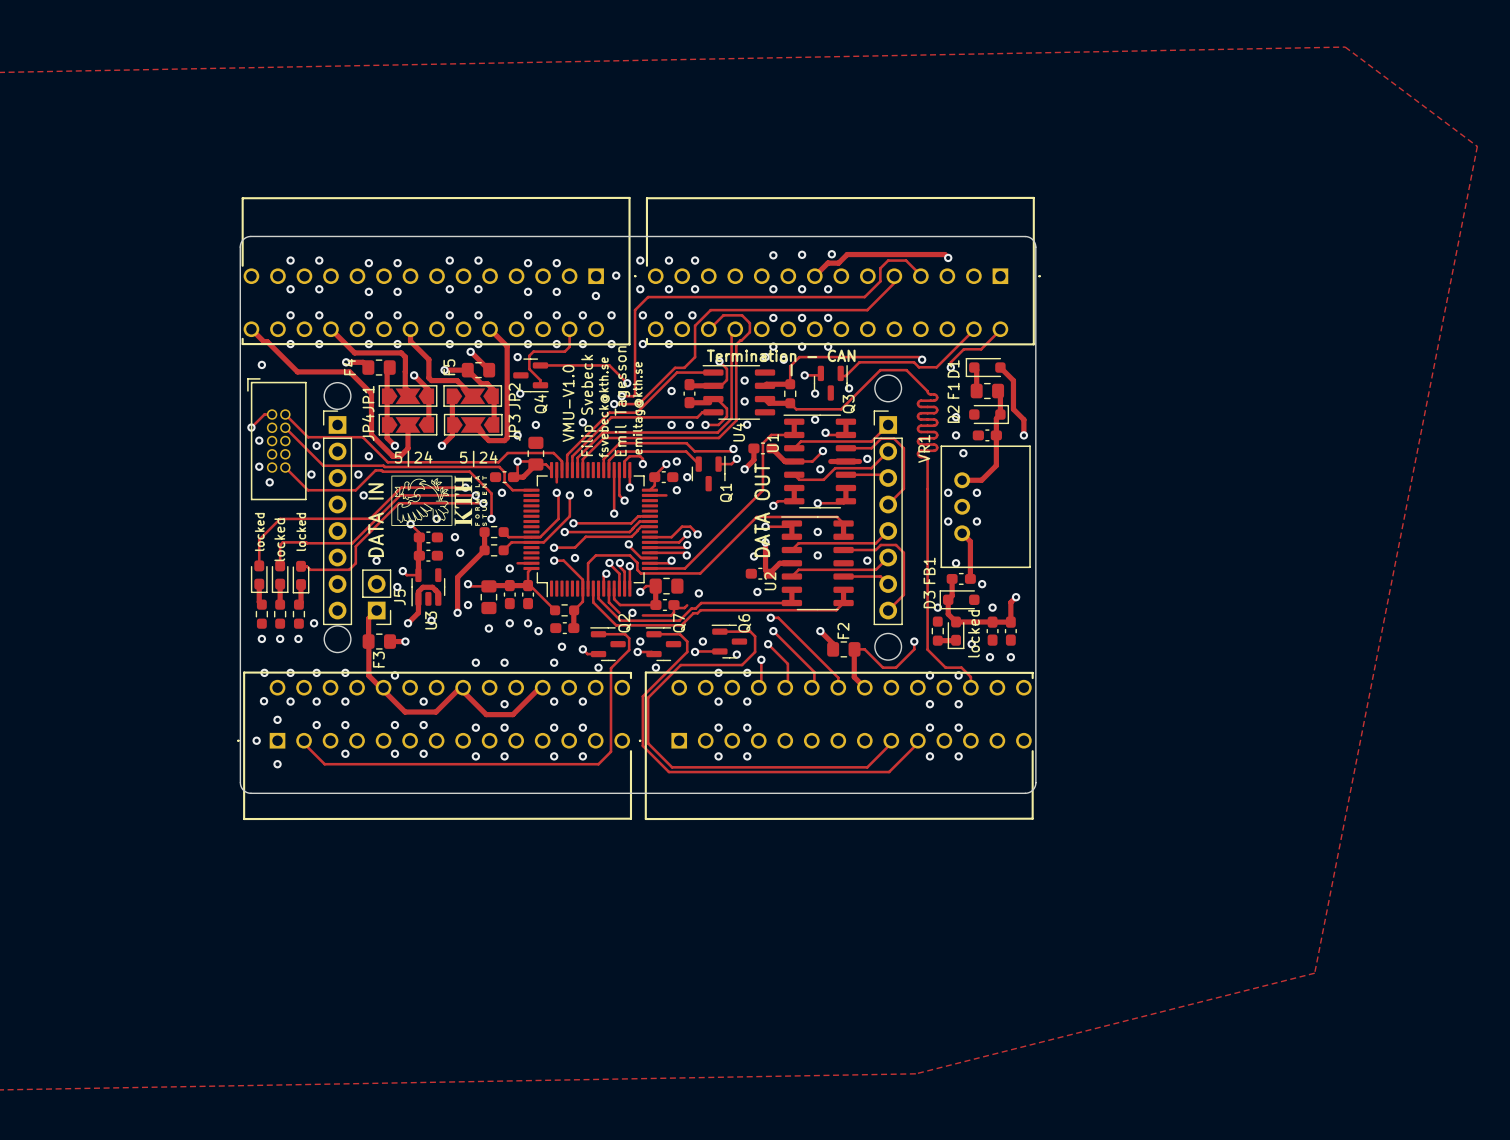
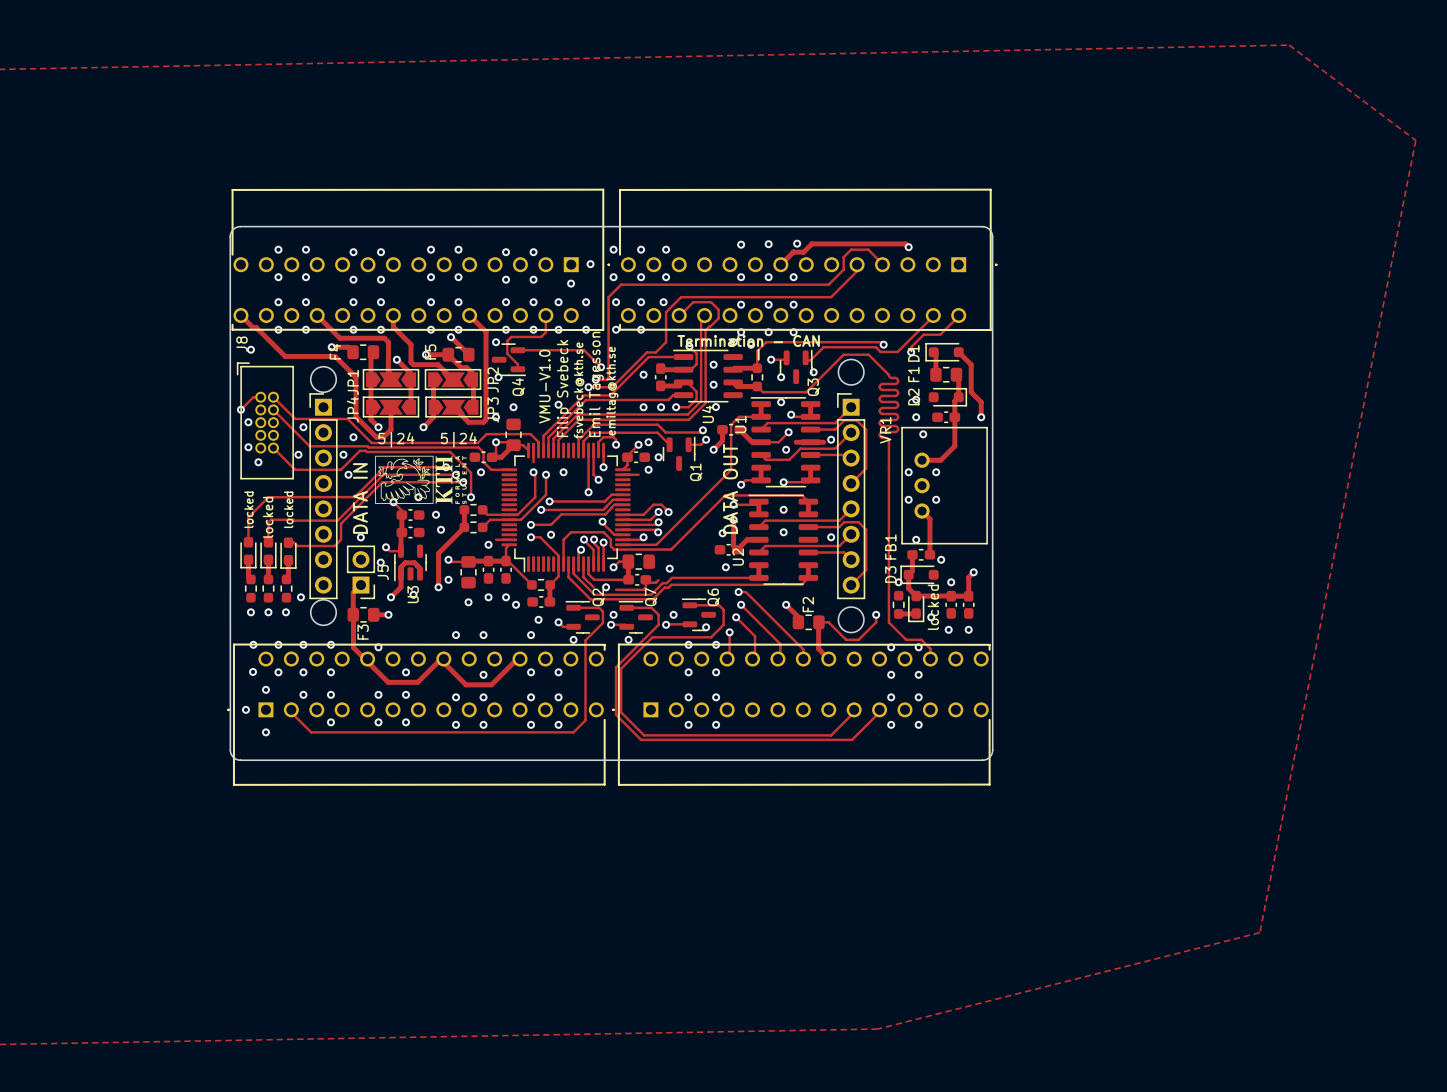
part: (276, 439) -> none
J8: none -> (265, 420)

